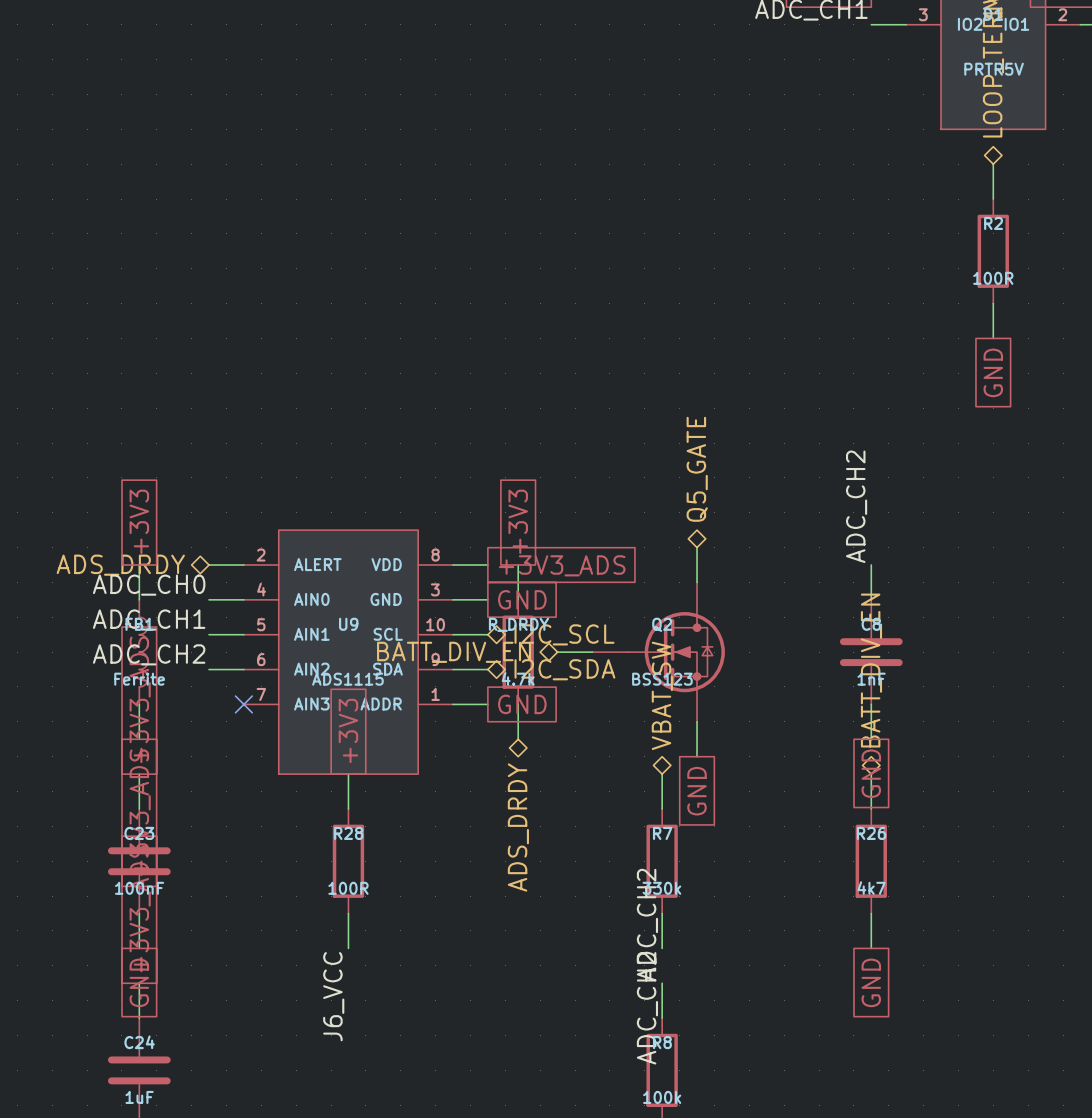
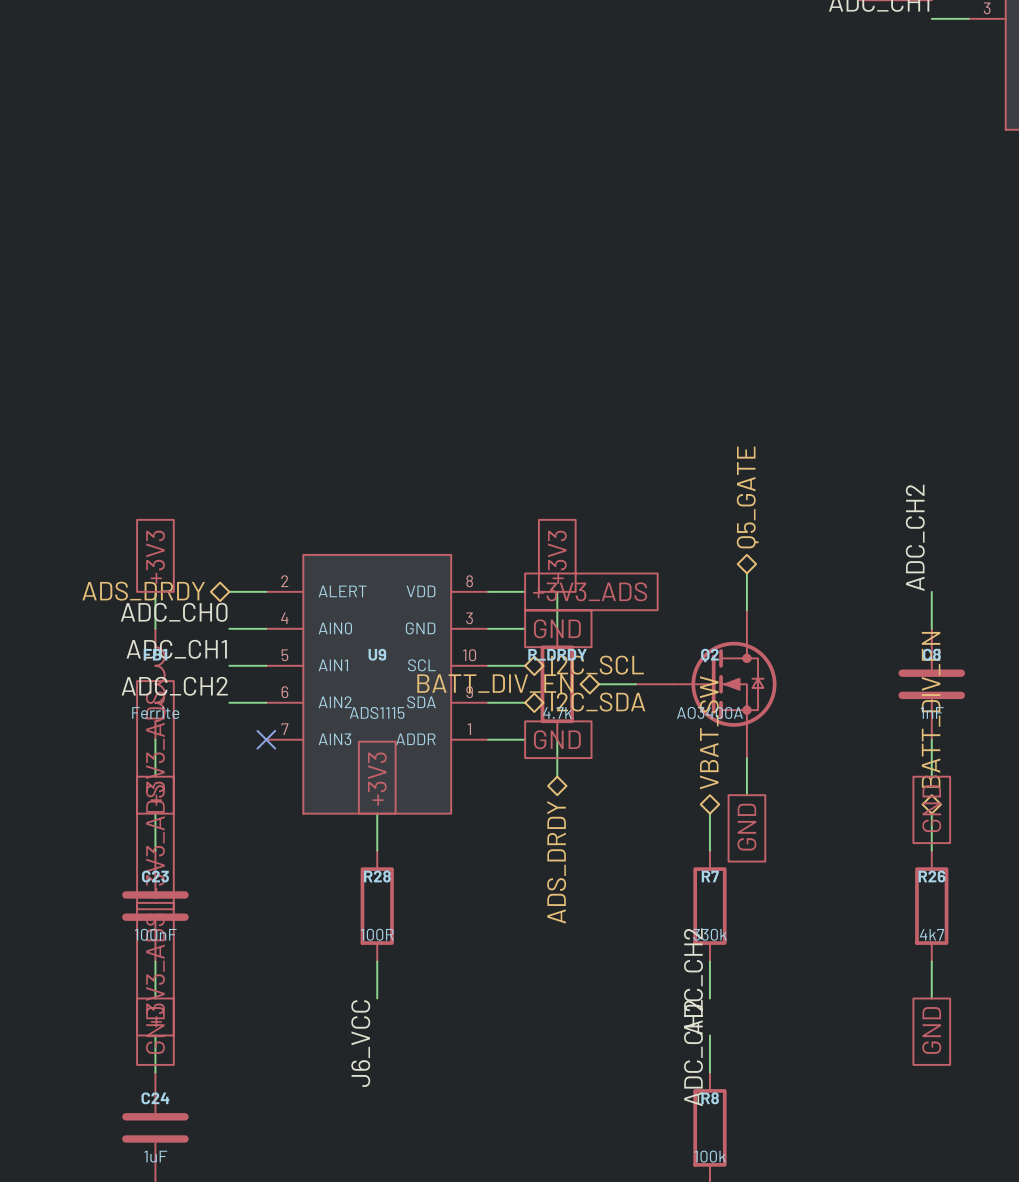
Q2 value: BSS123 (662, 679) -> AO3400A (709, 712)

